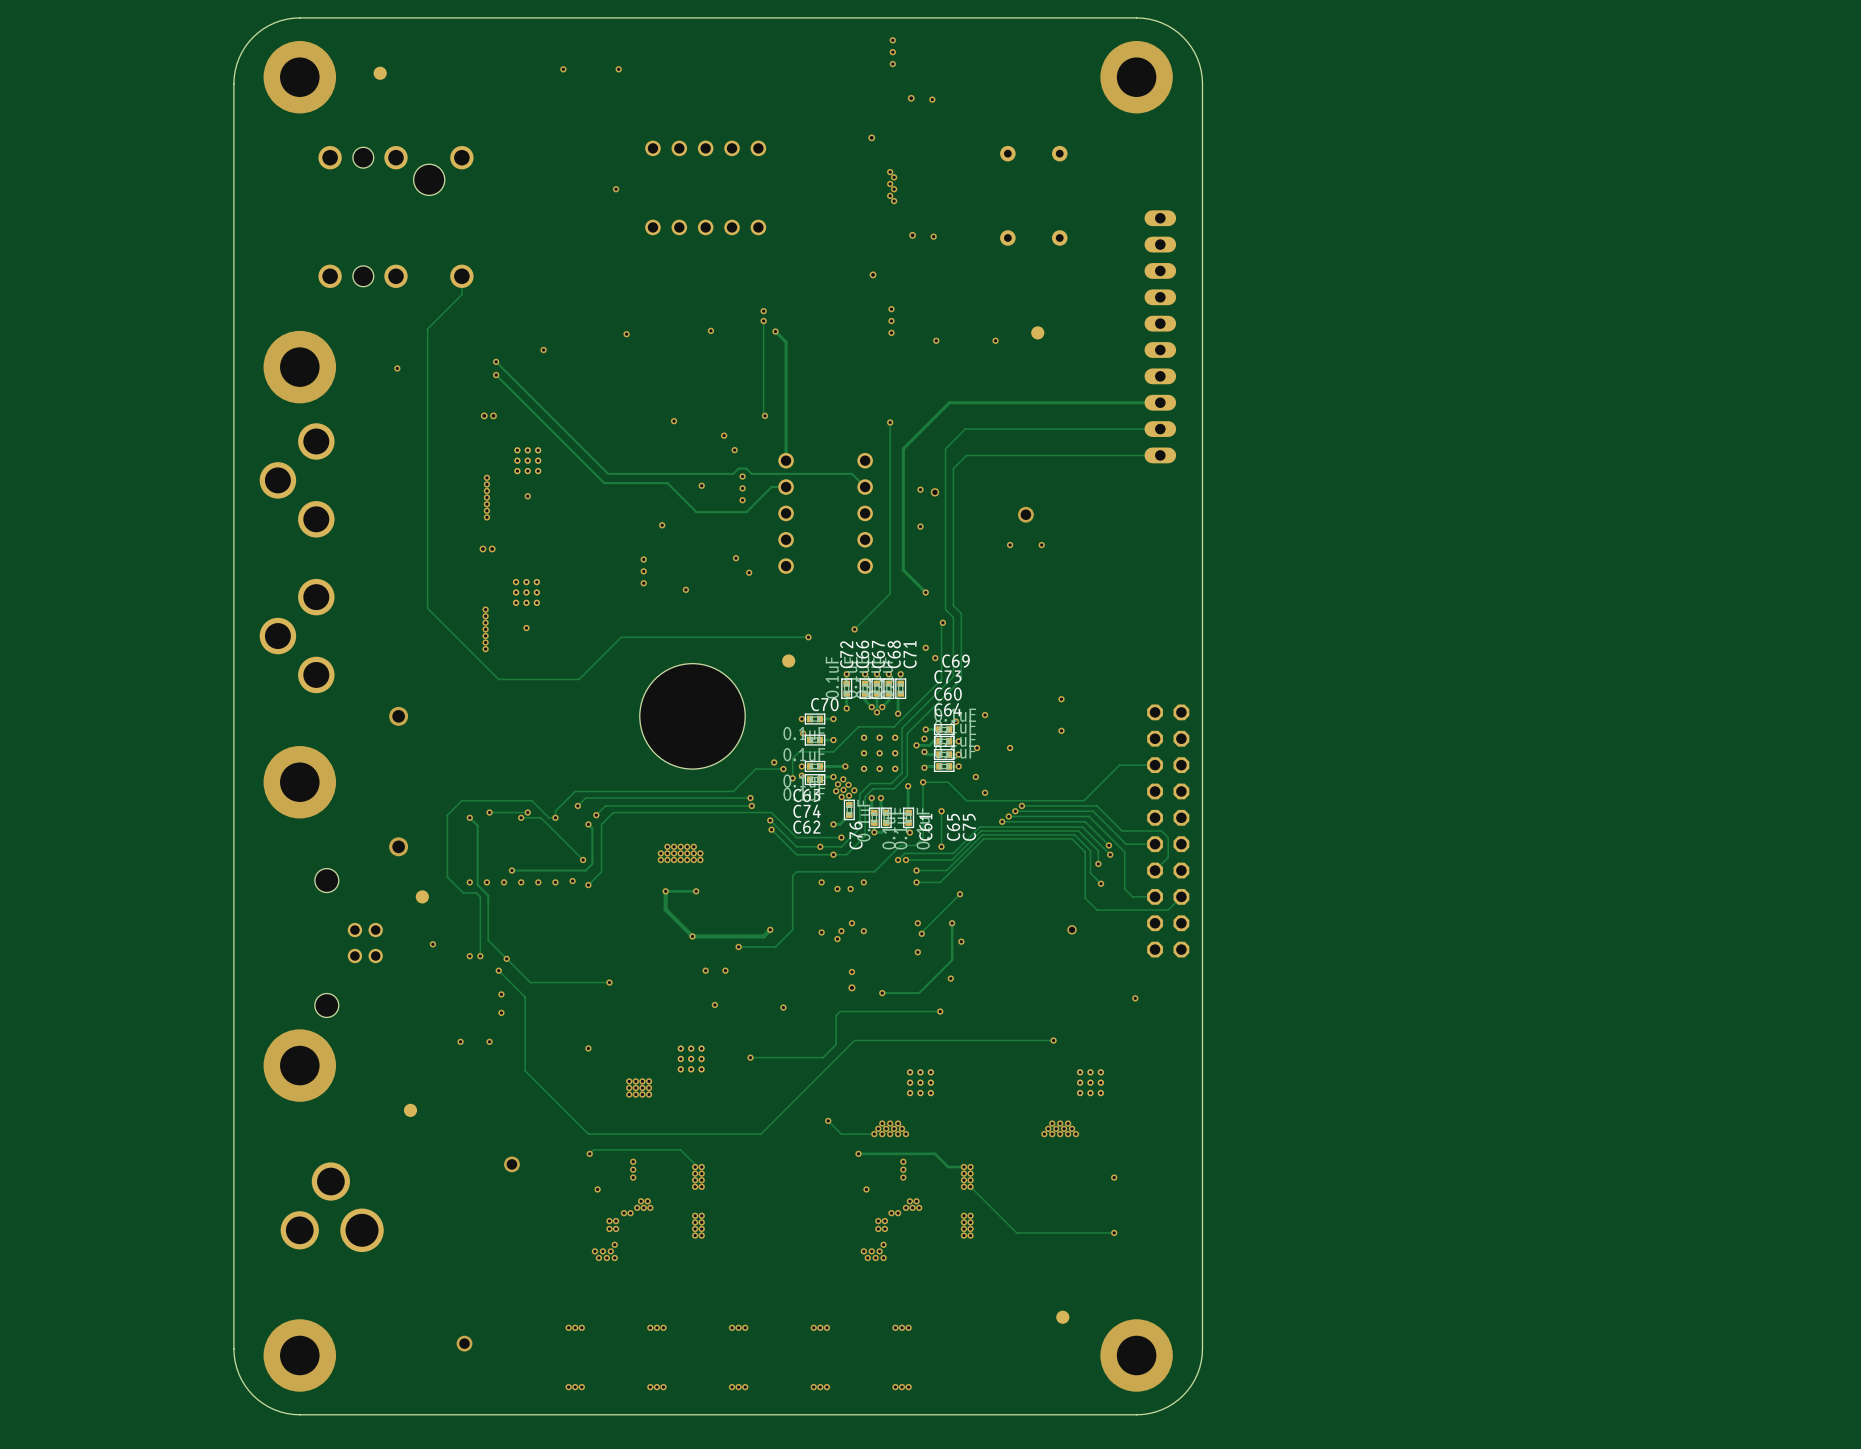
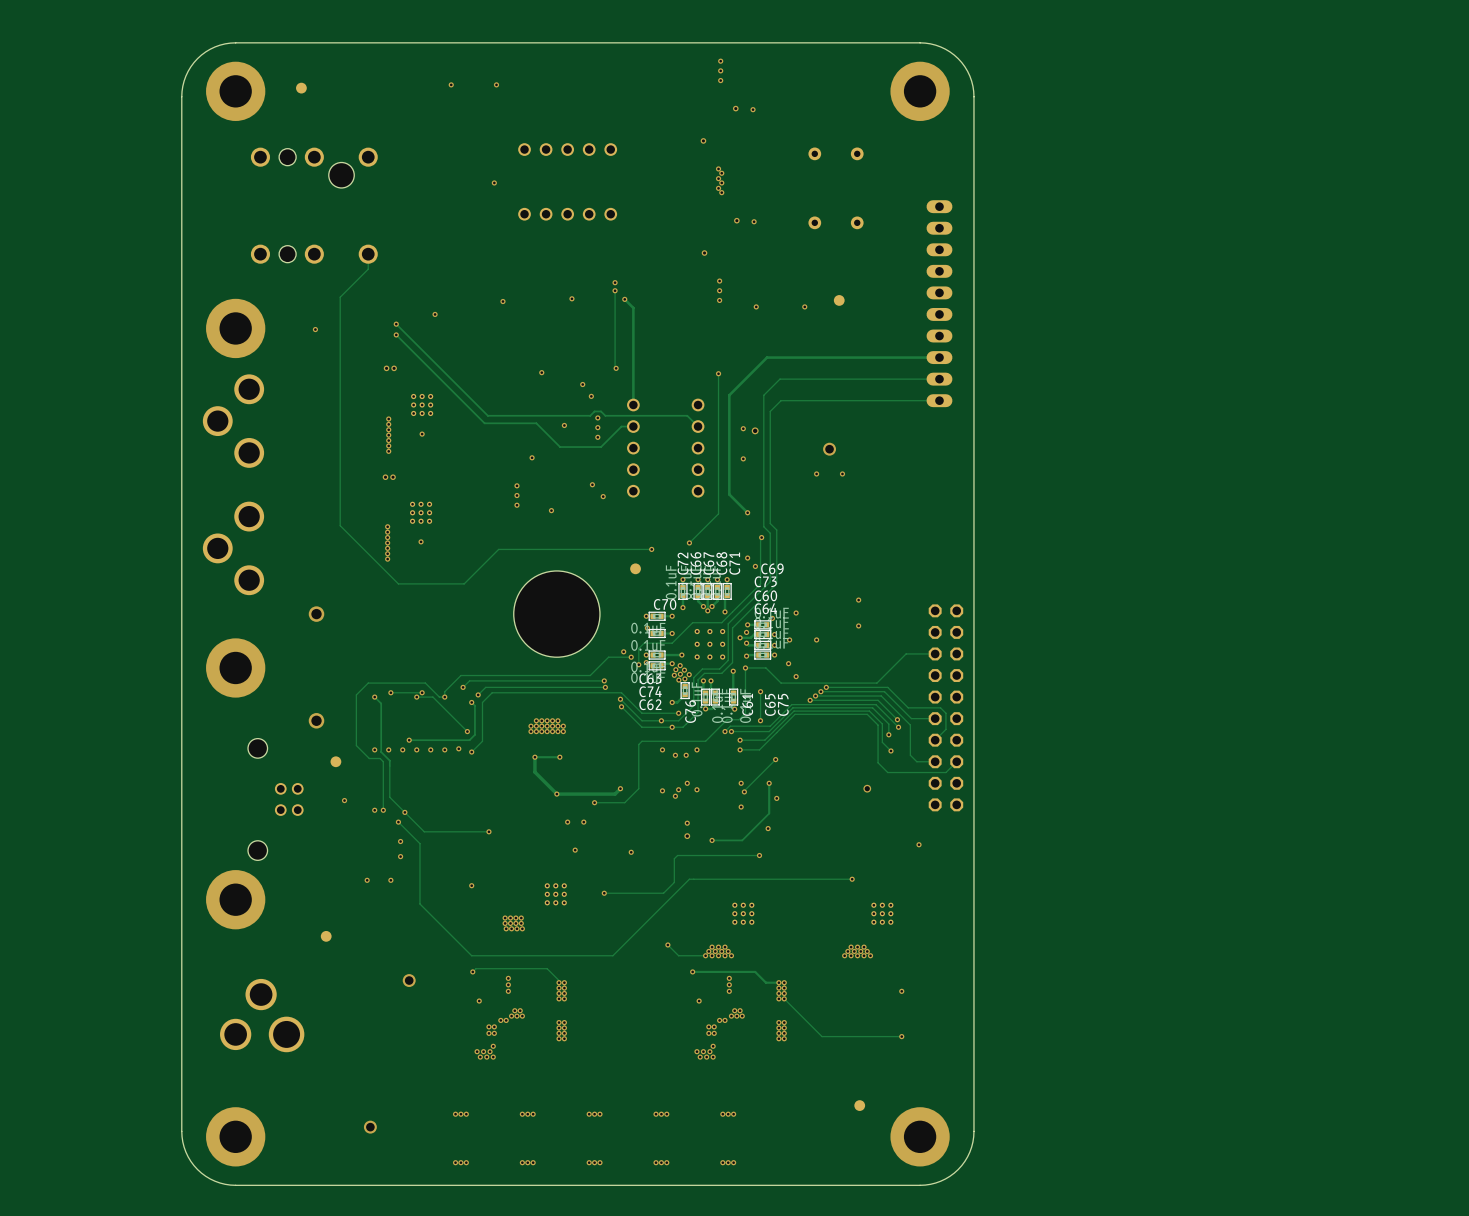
via: (629, 1081) -> none
via: (635, 1081) -> none
via: (642, 1081) -> none
via: (649, 1081) -> none
via: none -> (506, 928)
via: none -> (511, 928)
via: none -> (516, 928)
via: none -> (522, 928)

